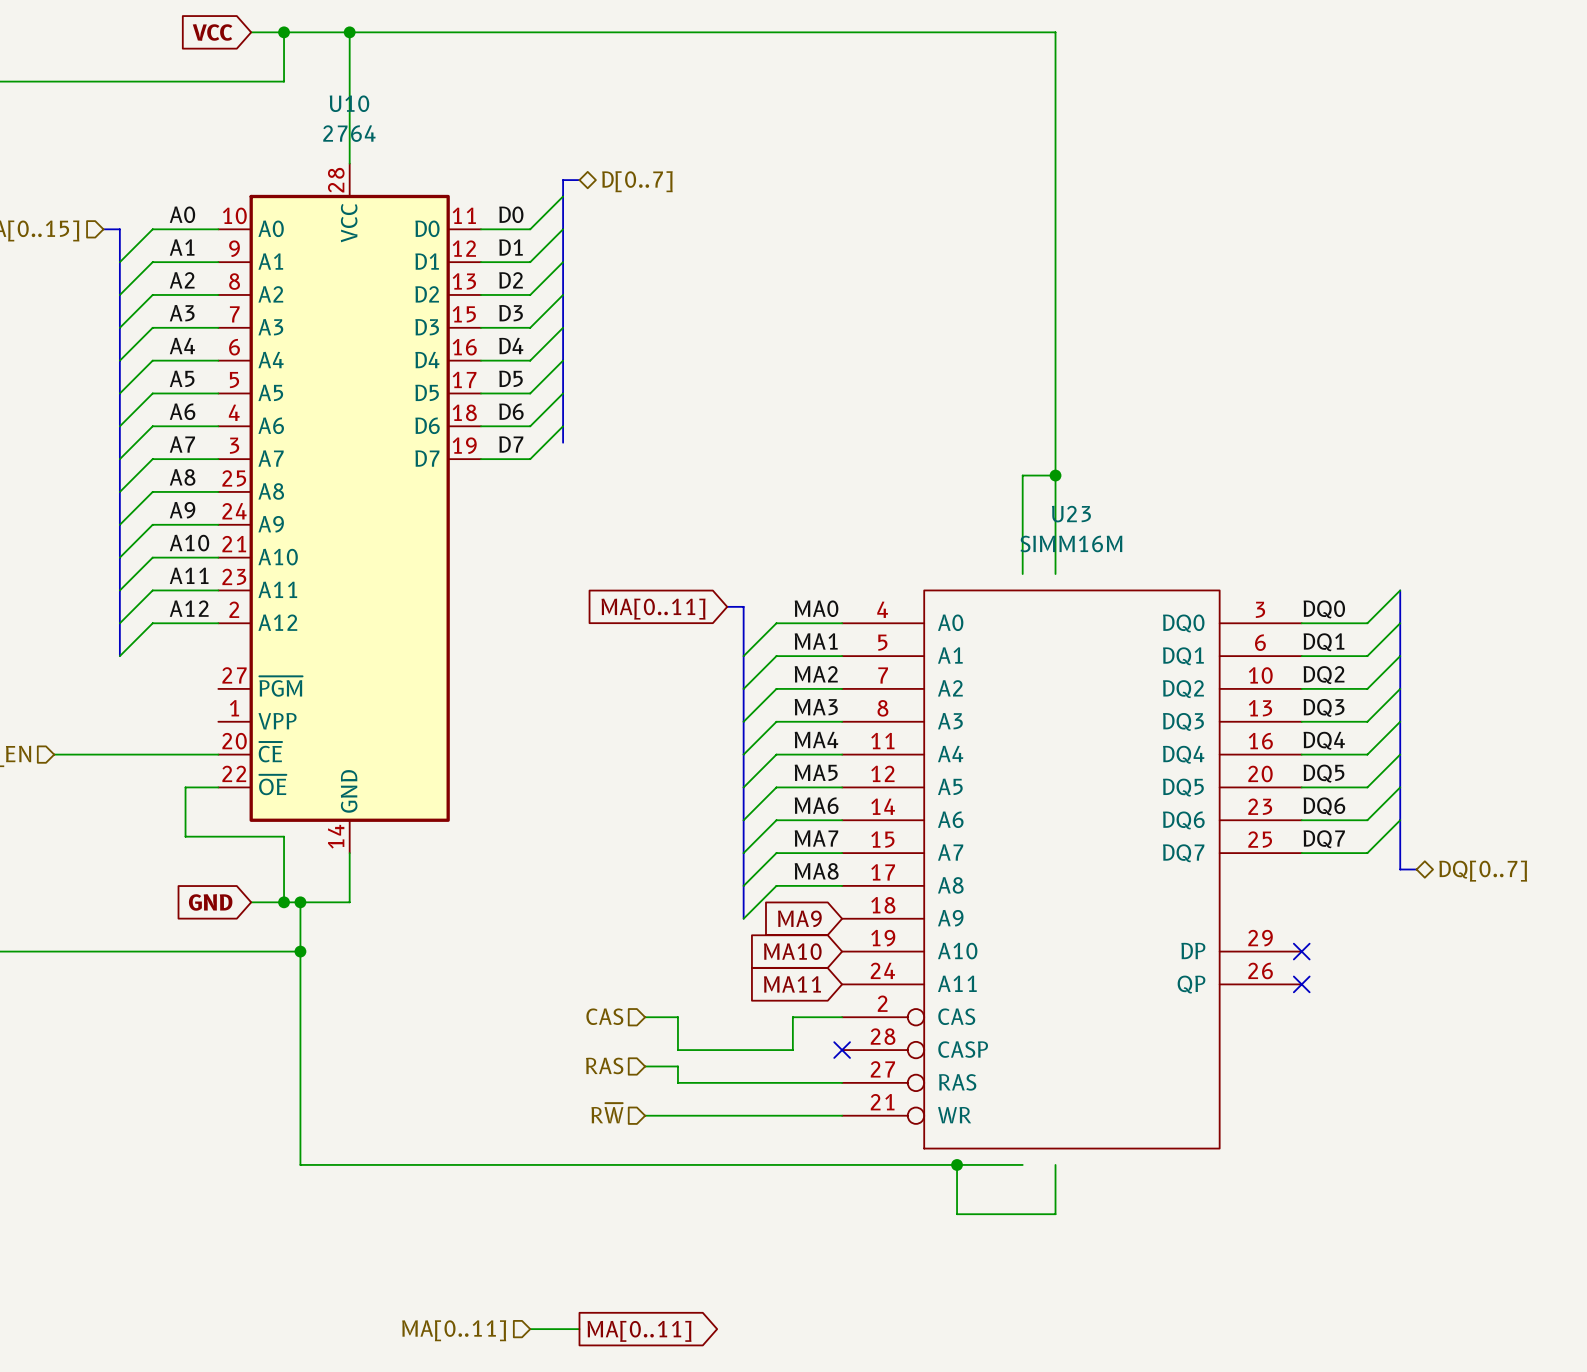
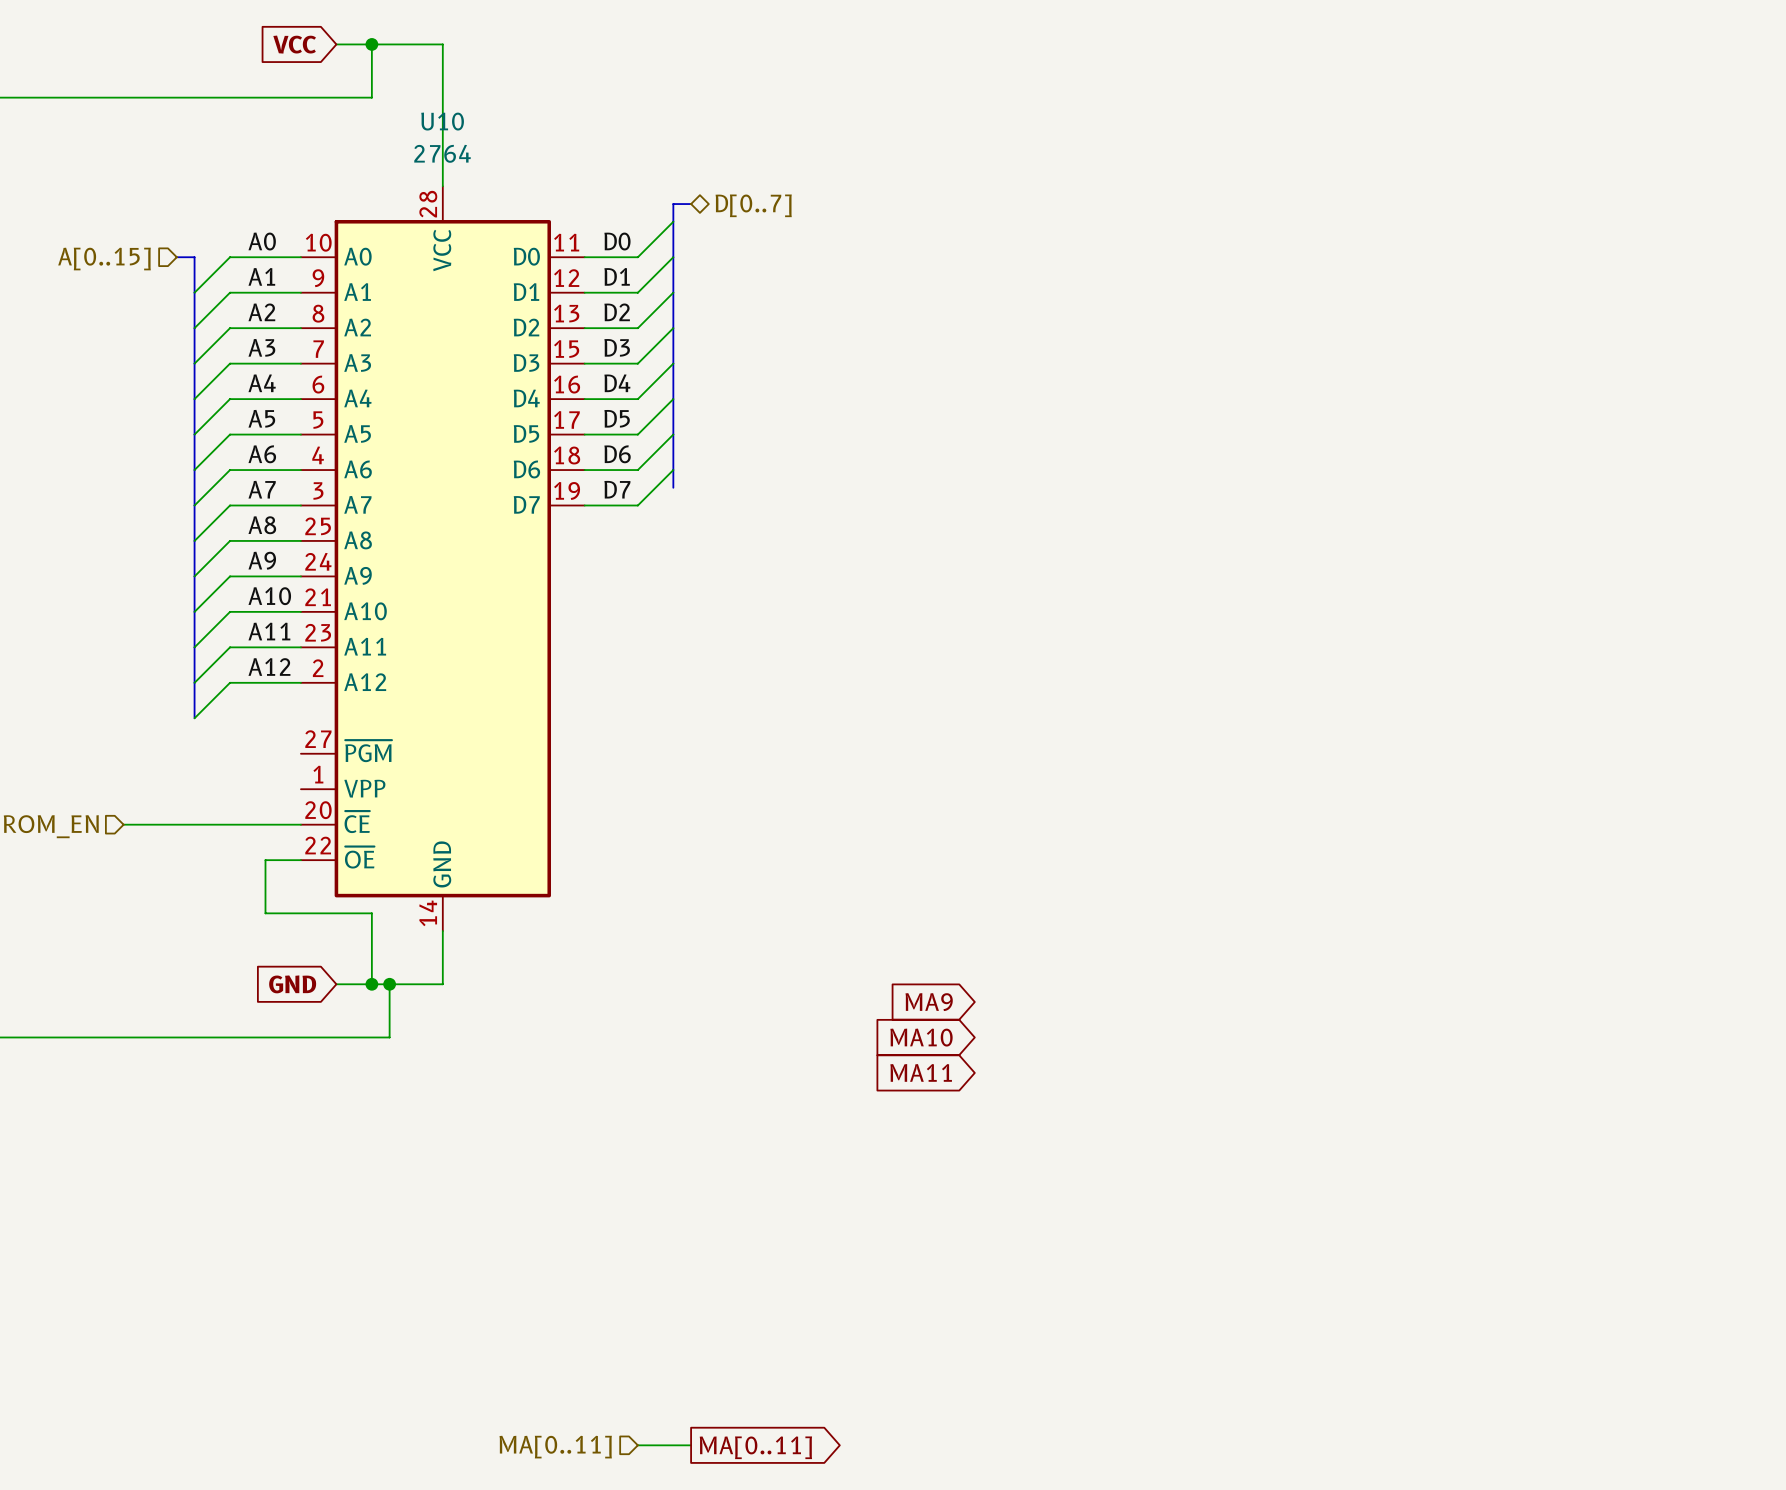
wire: (349, 32) (1055, 32) (1055, 574) -> none
junction: (349, 32) -> none
wire: (1055, 475) (1022, 475) (1022, 574) -> none
junction: (1055, 475) -> none
wire: (1400, 590) (1367, 623) (1301, 623) -> none
bus: (1400, 590) (1400, 869) (1416, 869) -> none
bus: (727, 606) (743, 606) (743, 918) -> none
label: MA0 (816, 608) -> none
global label: MA[0..11] (653, 609) -> none
label: DQ0 (1324, 609) -> none
wire: (842, 623) (776, 623) (743, 656) -> none
wire: (1400, 623) (1367, 656) (1301, 656) -> none
label: MA1 (816, 641) -> none
label: DQ1 (1323, 642) -> none
wire: (842, 656) (776, 656) (743, 688) -> none
wire: (1400, 656) (1367, 688) (1301, 688) -> none
label: MA2 (816, 674) -> none
label: DQ2 (1324, 675) -> none
wire: (842, 688) (776, 688) (743, 721) -> none
wire: (1400, 688) (1367, 721) (1301, 721) -> none
label: MA3 (816, 707) -> none
label: DQ3 (1324, 707) -> none
wire: (842, 721) (776, 721) (743, 754) -> none
wire: (1400, 721) (1367, 754) (1301, 754) -> none
label: MA4 (816, 739) -> none
label: DQ4 (1324, 740) -> none
wire: (842, 754) (776, 754) (743, 787) -> none
wire: (1400, 754) (1367, 787) (1301, 787) -> none
label: MA5 (816, 772) -> none
label: DQ5 (1323, 773) -> none
wire: (842, 787) (776, 787) (743, 820) -> none
wire: (1400, 787) (1367, 820) (1301, 820) -> none
label: MA6 (816, 805) -> none
label: DQ6 (1324, 806) -> none
wire: (842, 820) (776, 820) (743, 853) -> none
wire: (1400, 820) (1367, 853) (1301, 853) -> none
label: MA7 (816, 838) -> none
label: DQ7 (1324, 839) -> none
wire: (842, 853) (776, 853) (743, 885) -> none
U23: SIMM16M (1071, 869) -> none
label: MA8 (816, 871) -> none
hierarchical label: DQ[0..7] (1483, 871) -> none
wire: (842, 885) (776, 885) (743, 918) -> none
wire: (300, 951) (300, 1164) (1022, 1164) -> none
junction: (300, 951) -> none
no-connect mark: (1301, 951) -> none
no-connect mark: (1301, 984) -> none
hierarchical label: CAS (604, 1016) -> none
wire: (645, 1017) (677, 1017) (677, 1050) (792, 1050) (792, 1017) (842, 1017) -> none
no-connect mark: (842, 1050) -> none
hierarchical label: RAS (604, 1065) -> none
wire: (645, 1066) (677, 1066) (677, 1082) (842, 1082) -> none
hierarchical label: R~{W} (607, 1113) -> none
wire: (645, 1115) (842, 1115) -> none
wire: (957, 1164) (957, 1214) (1055, 1214) (1055, 1164) -> none
junction: (957, 1164) -> none

